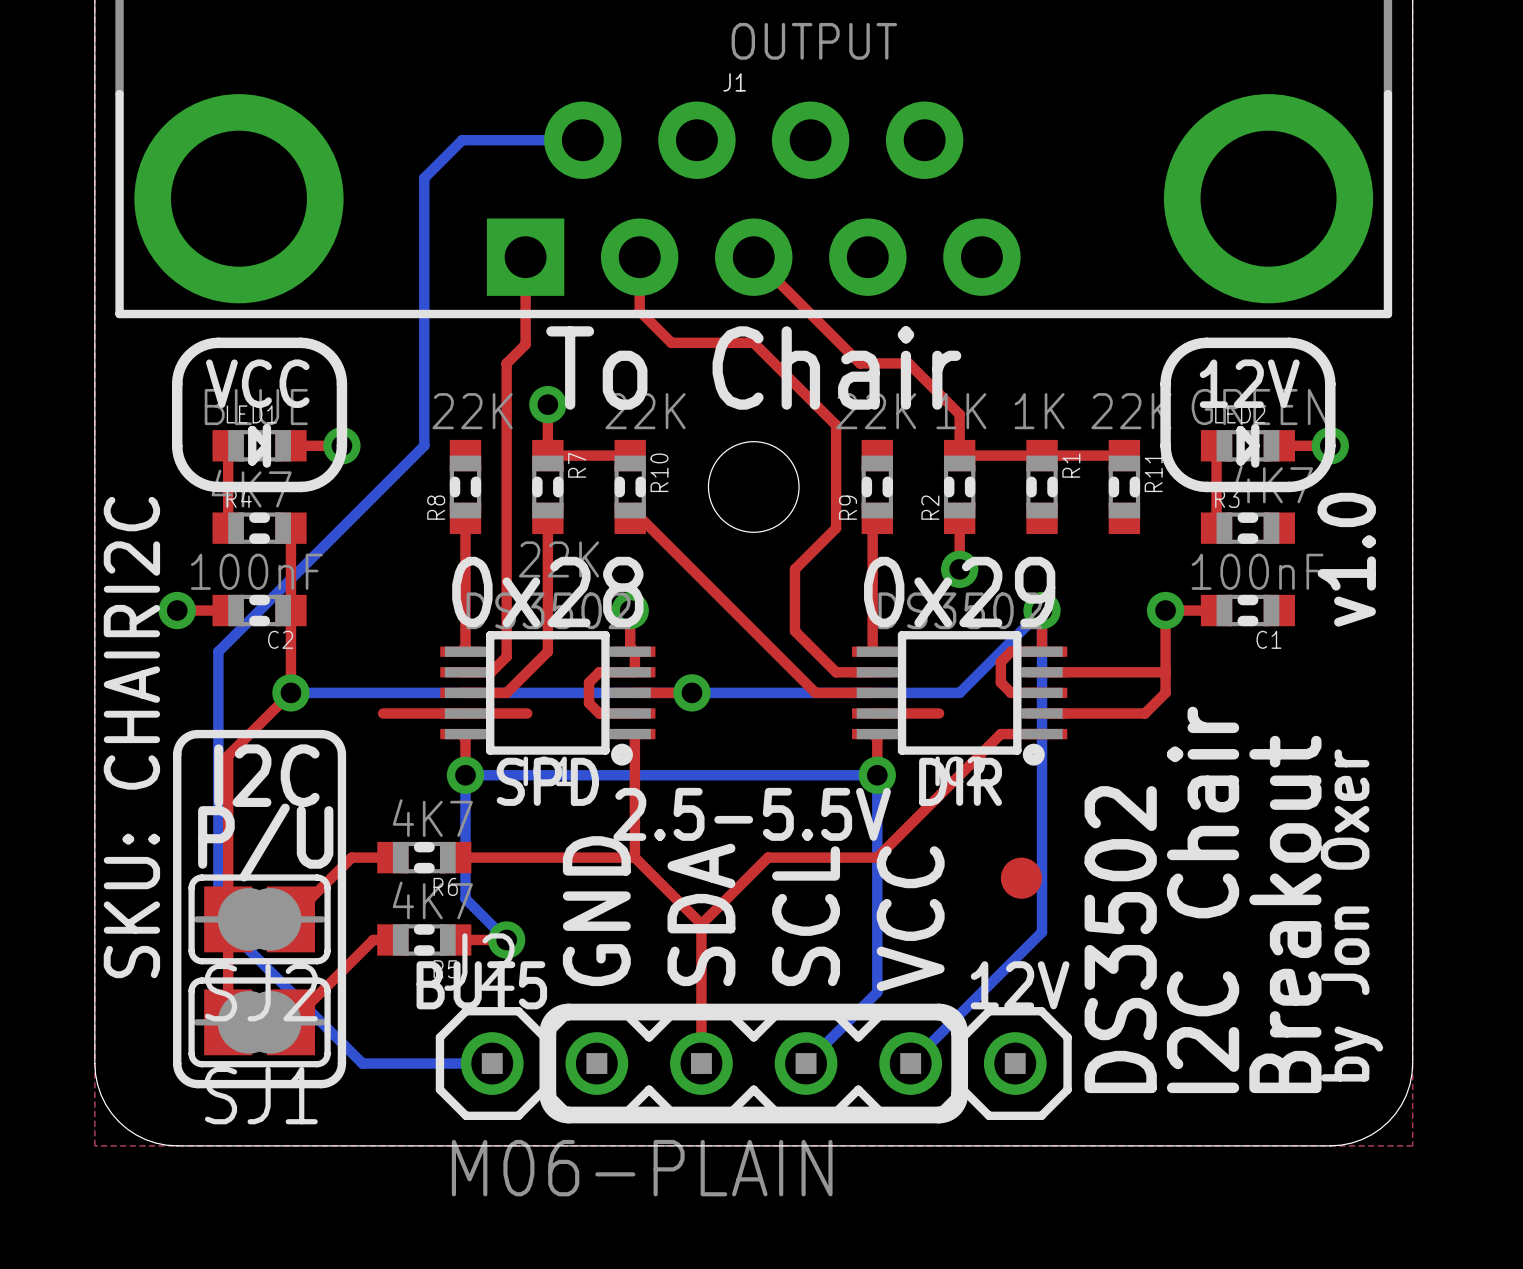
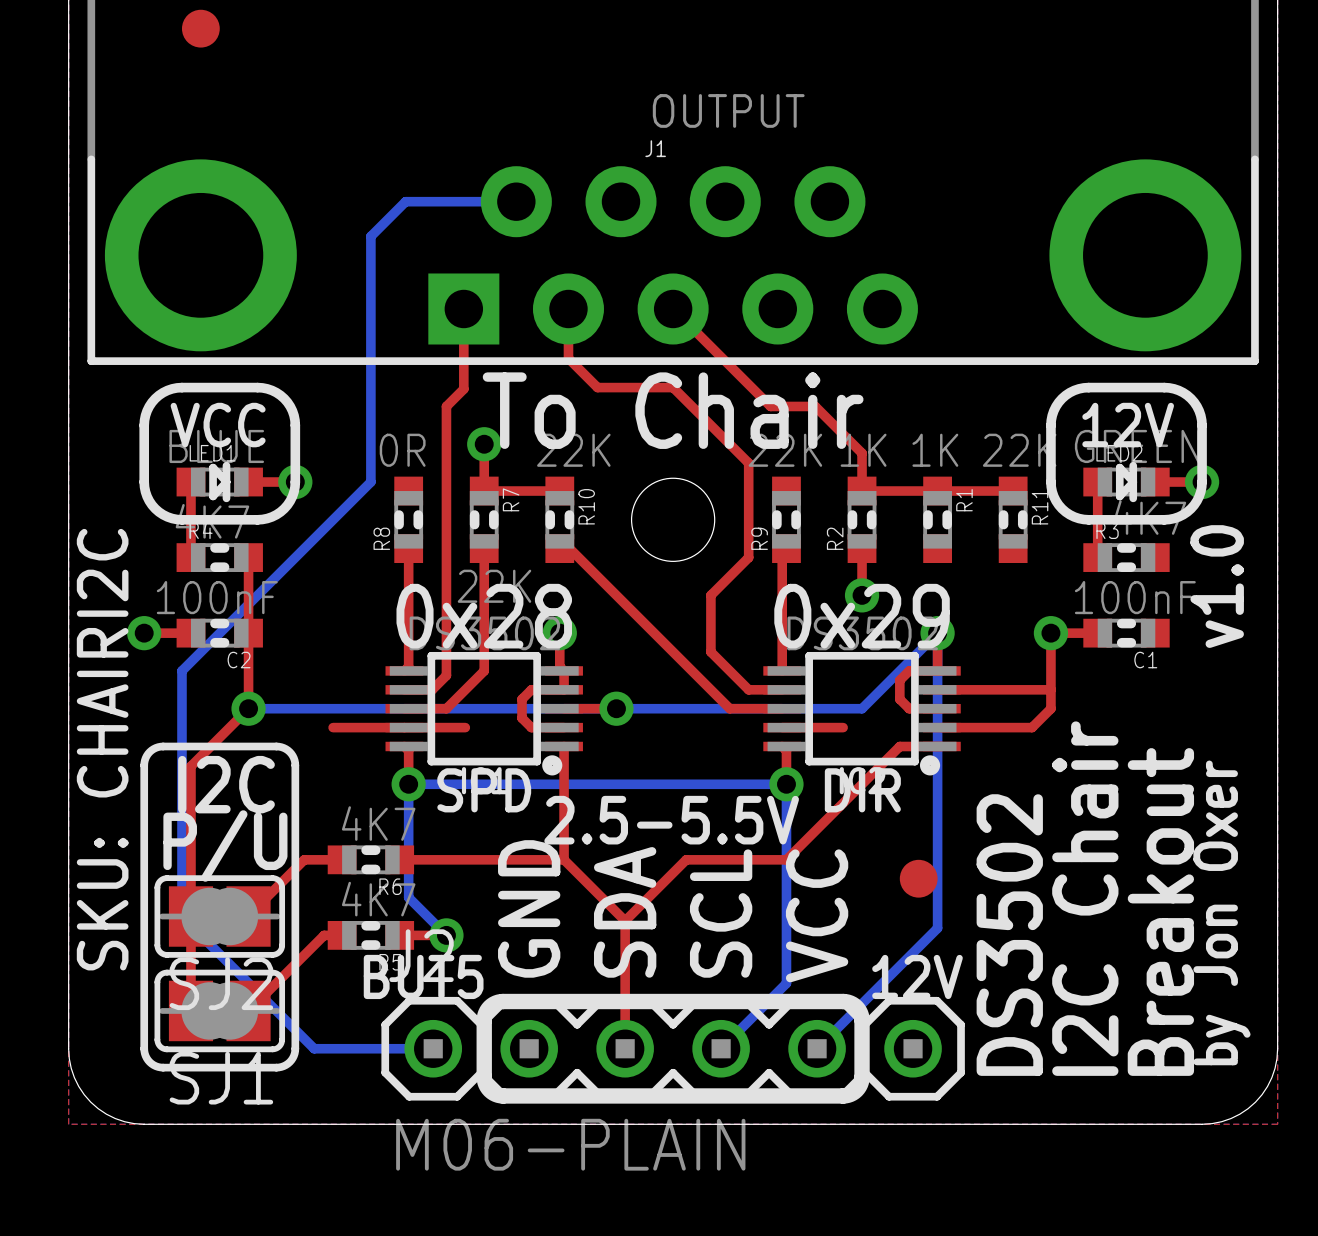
R8 value: 22K (472, 411) -> 0R (402, 450)

